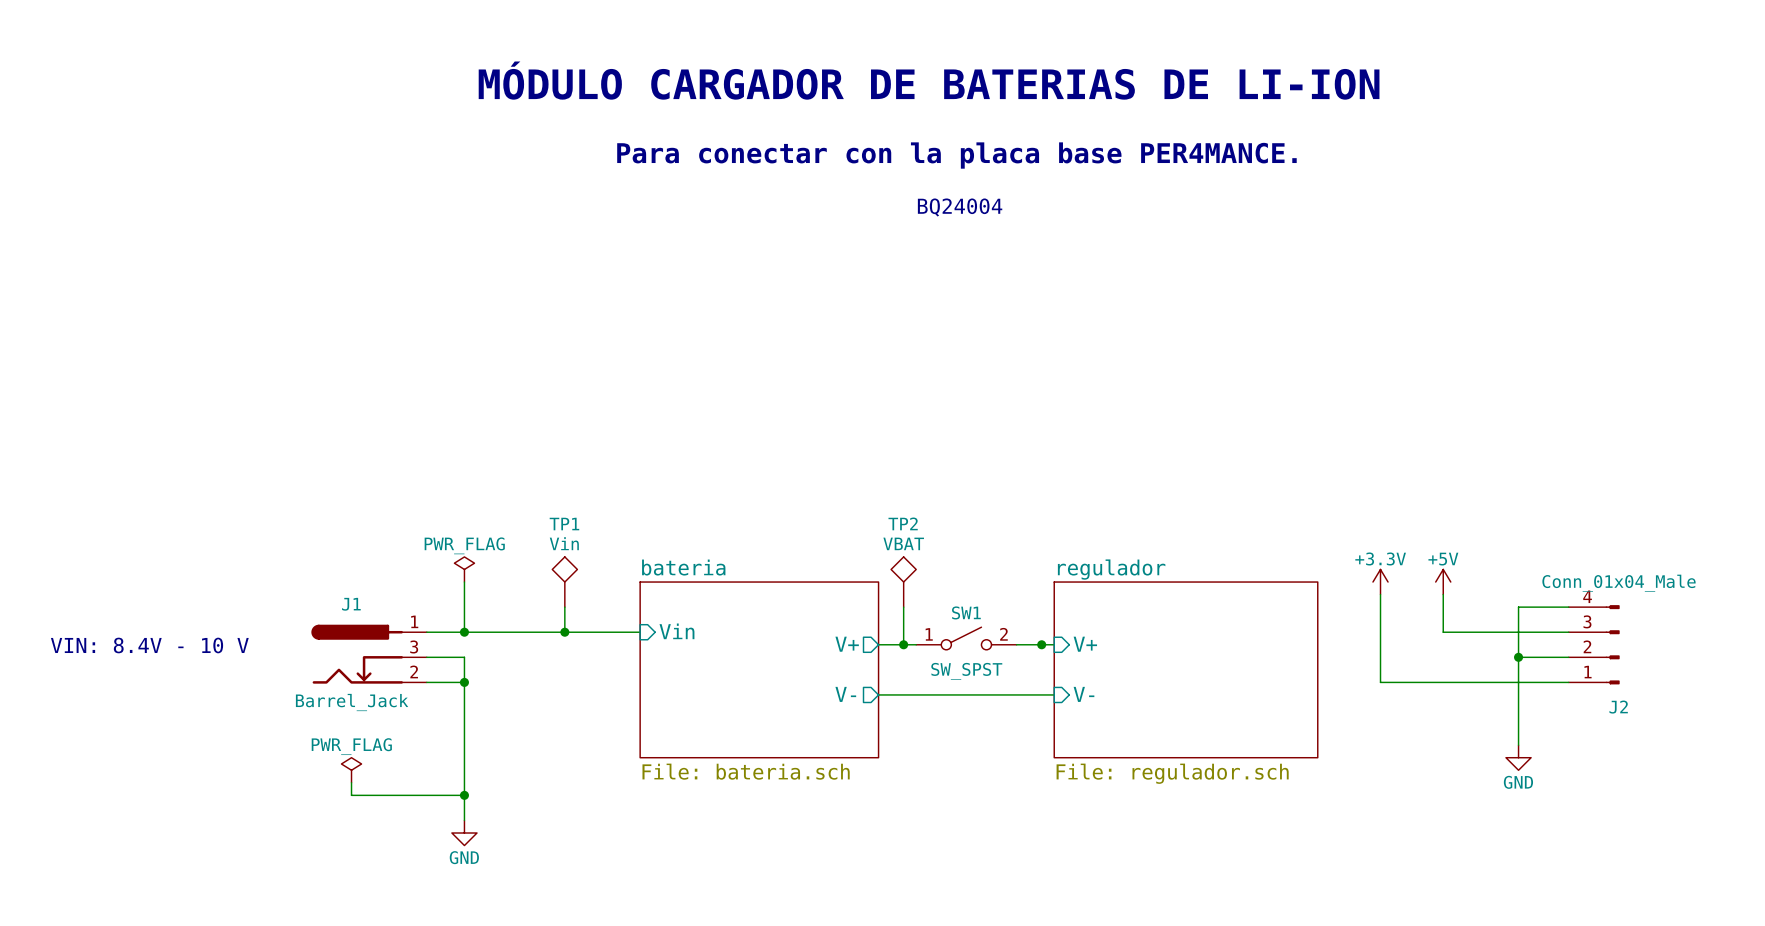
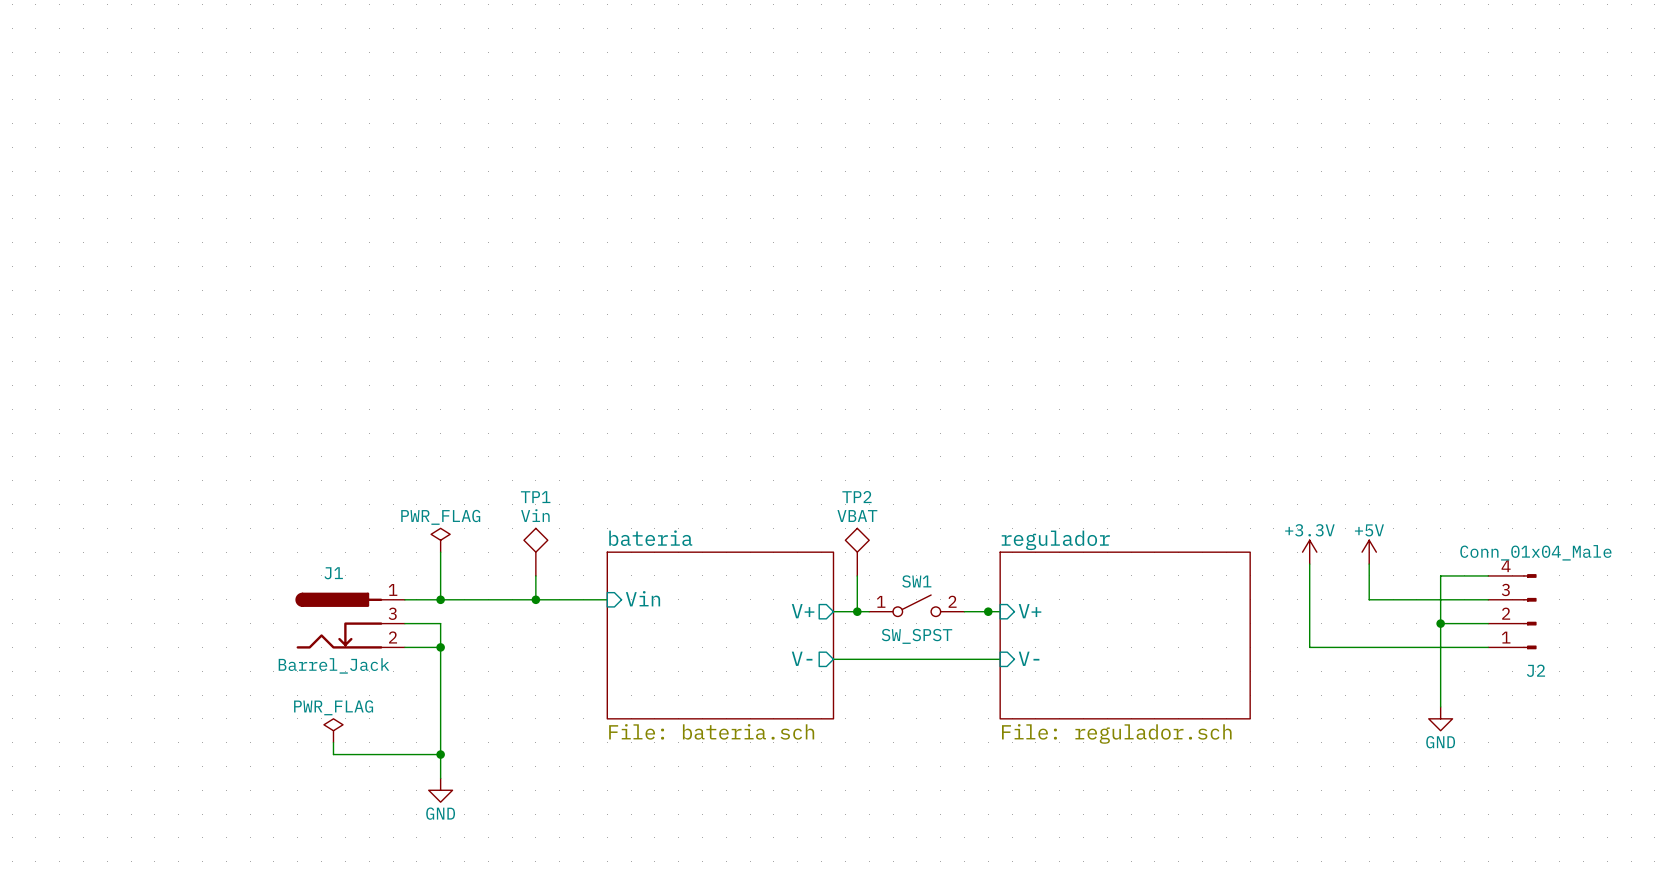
text: MÓDULO CARGADOR DE BATERIAS DE LI-ION (929, 80) -> none
text: Para conectar con la placa base PER4MANCE. (956, 155) -> none
text: BQ24004 (960, 207) -> none
text: VIN: 8.4V - 10 V (149, 645) -> none

